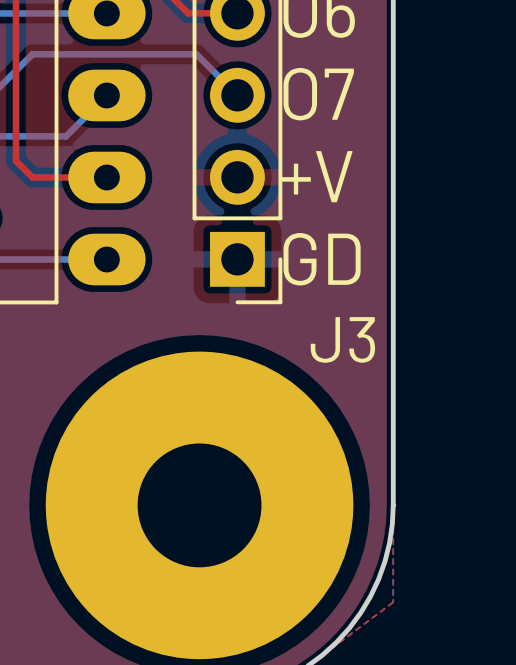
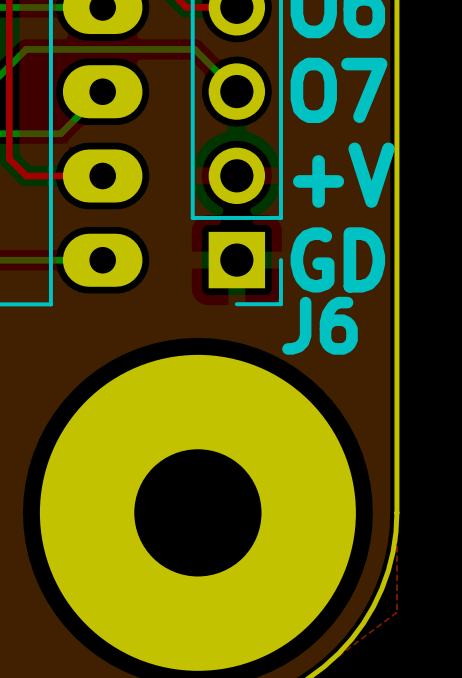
J3 name: J3 (342, 339) -> J6 (320, 325)

